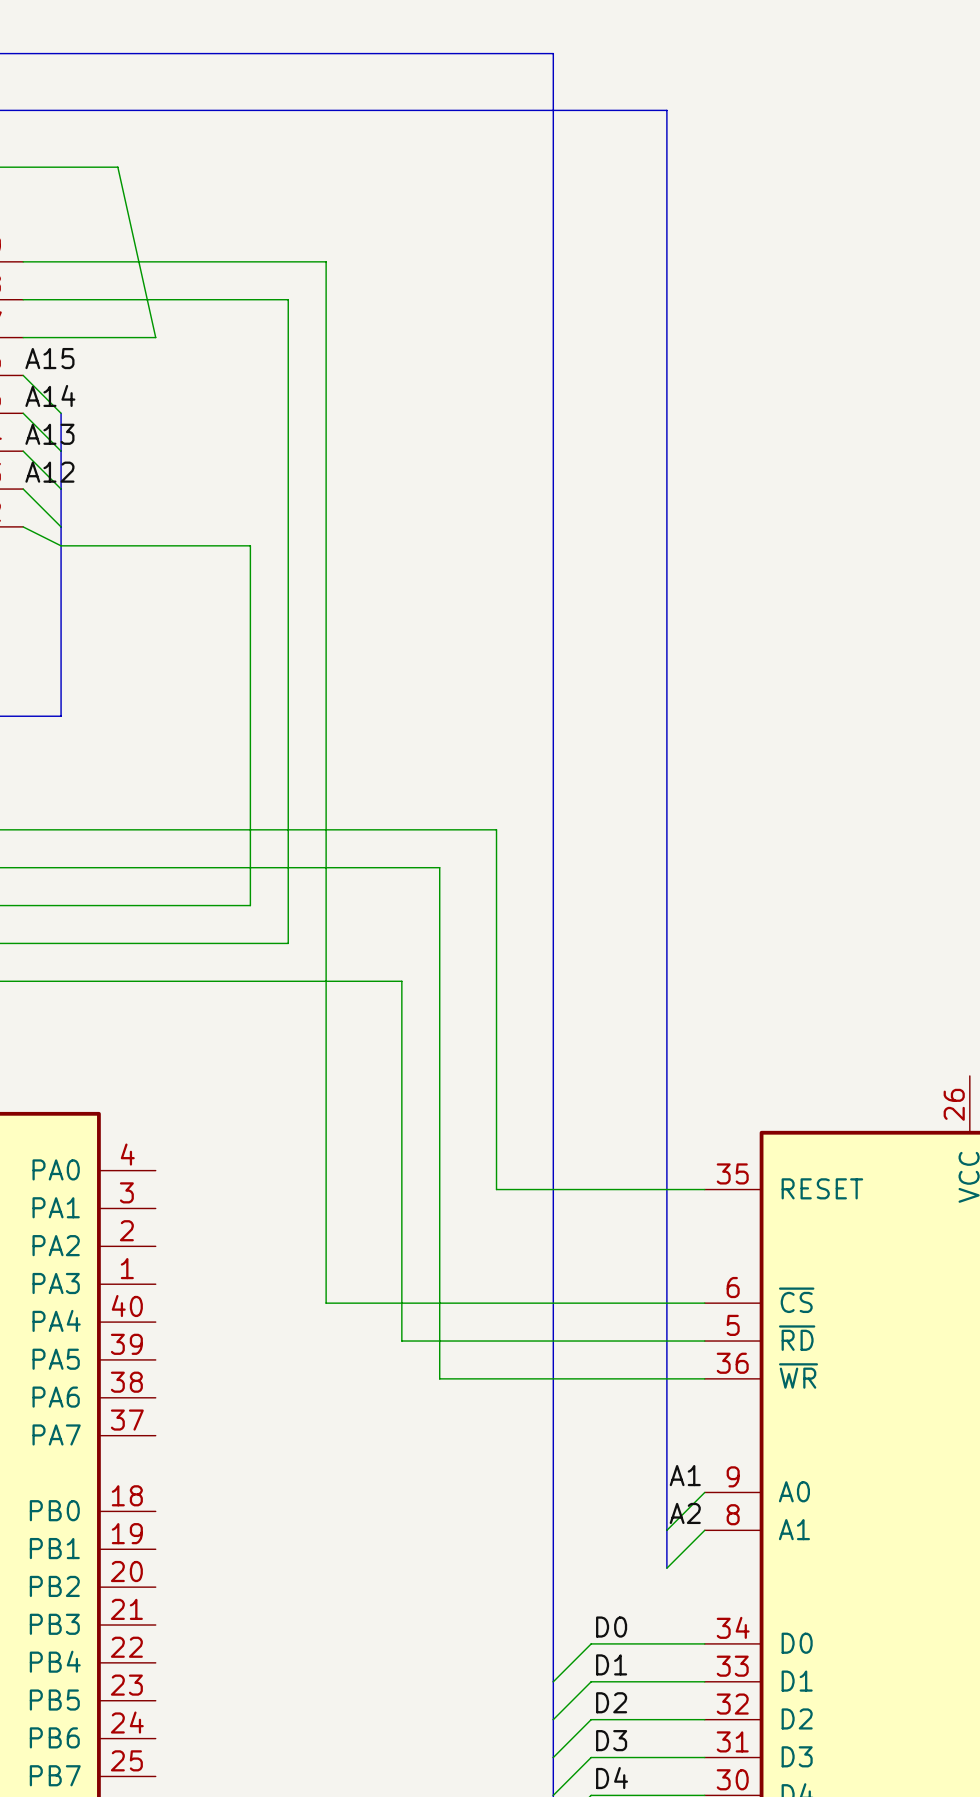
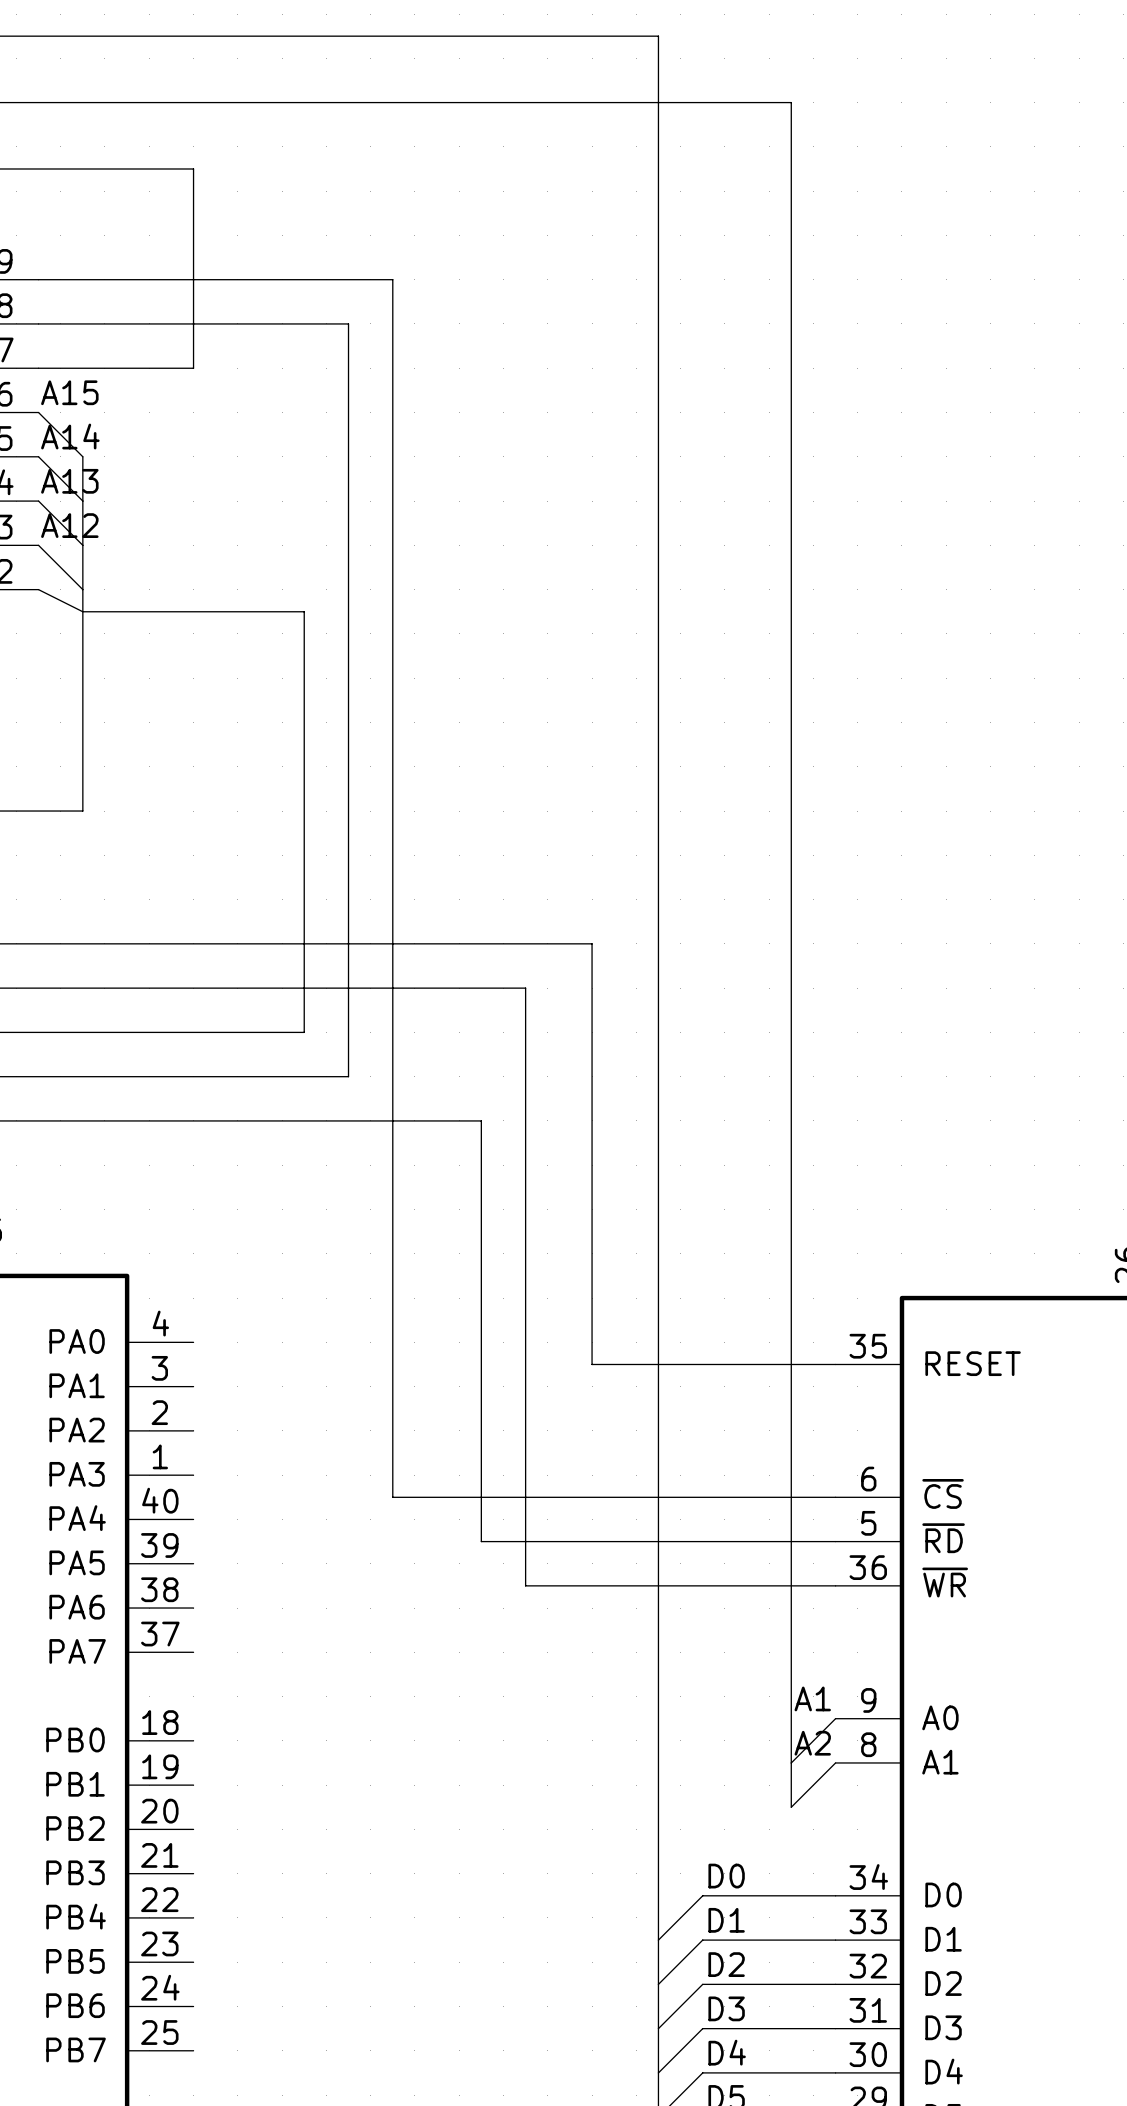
wire: (117, 167) (155, 337) -> (149, 168) (193, 168) (193, 368)

